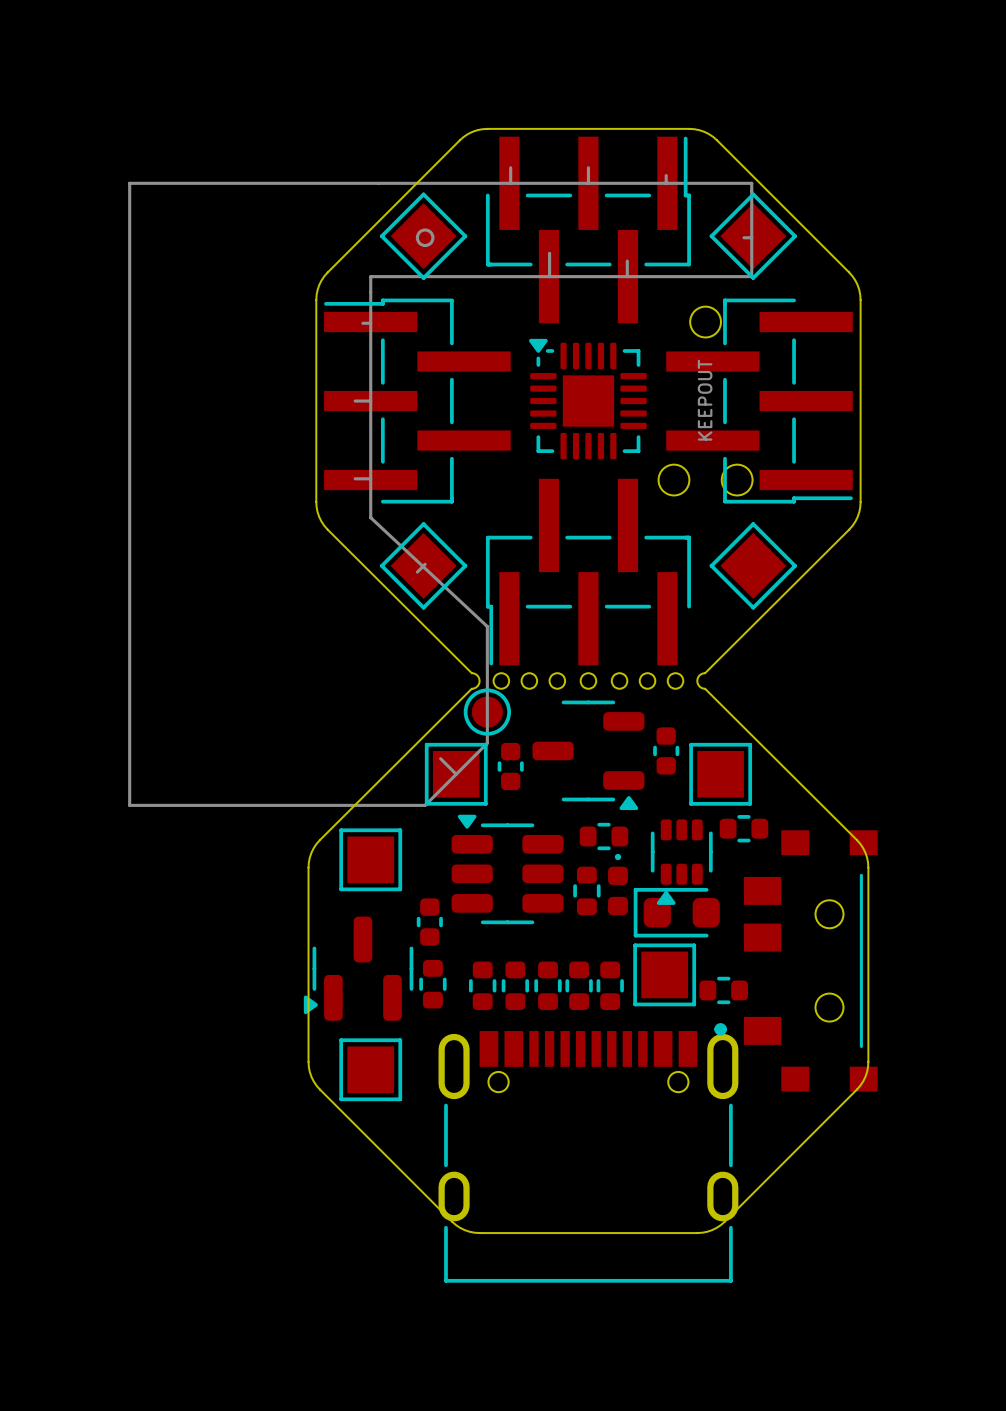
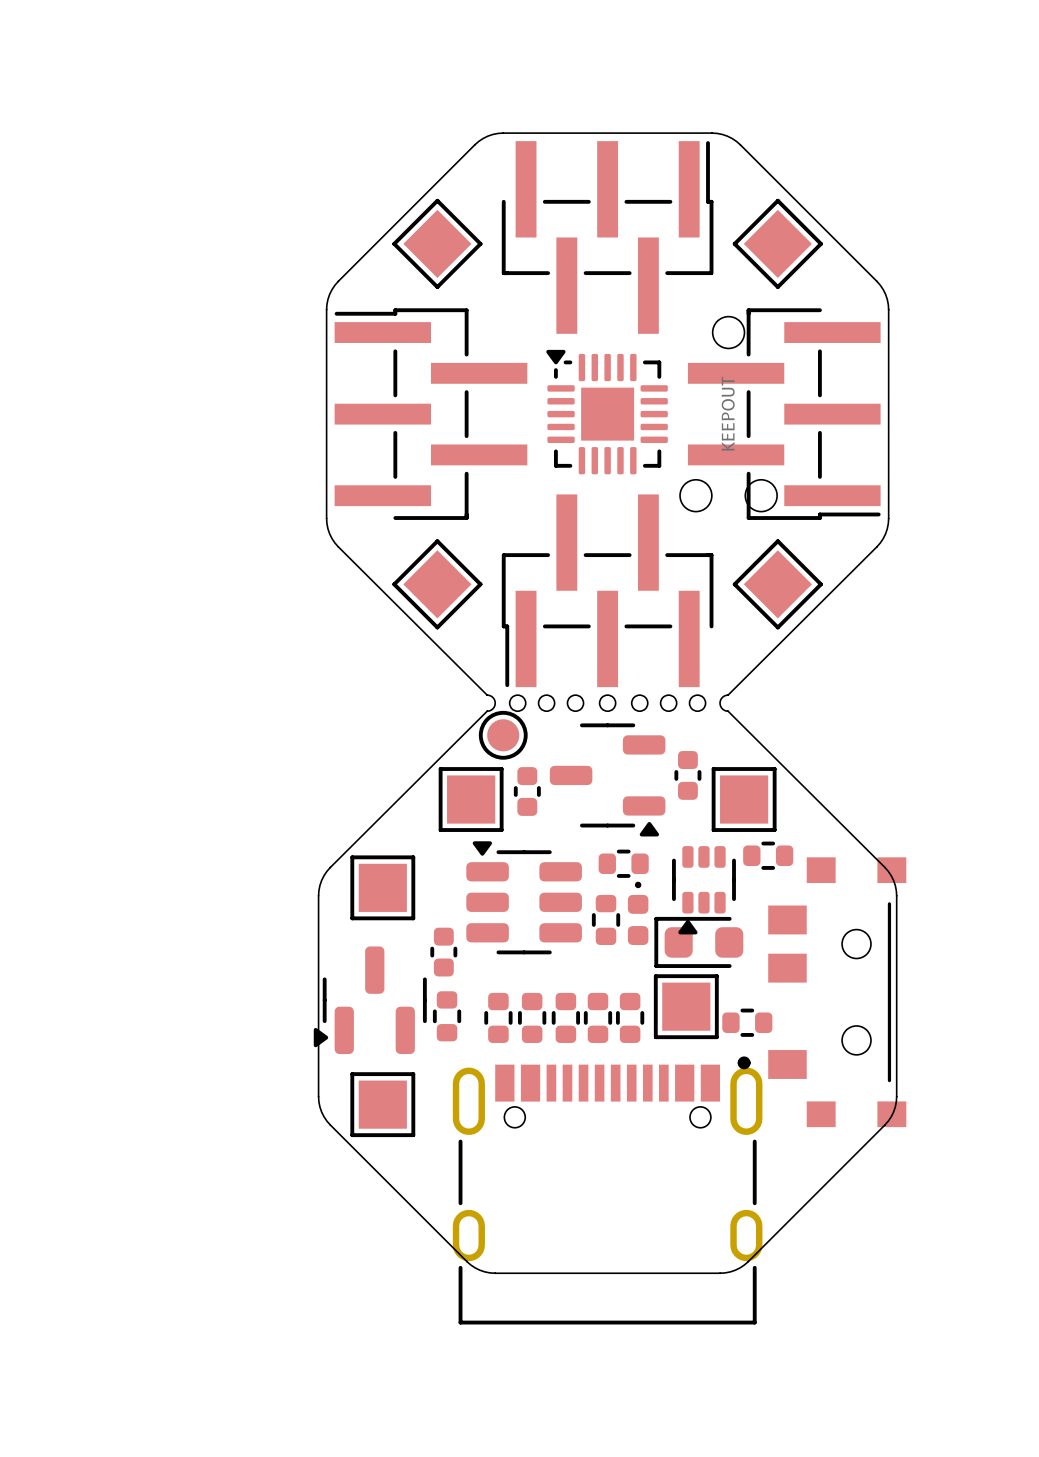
line: (510, 167) (510, 183) -> none
line: (588, 167) (588, 183) -> none
line: (666, 175) (666, 183) -> none
line: (129, 183) (751, 183) (751, 276) (370, 276) (370, 517) (487, 626) (487, 743) (425, 805) (129, 805) (129, 183) -> none
drawing: [415, 228, 435, 248] -> none
line: (743, 237) (751, 237) -> none
line: (549, 253) (549, 276) -> none
line: (627, 261) (627, 276) -> none
line: (362, 323) (370, 323) -> none
line: (355, 401) (370, 401) -> none
line: (355, 478) (370, 478) -> none
line: (425, 564) (417, 572) -> none
line: (440, 758) (456, 774) -> none

